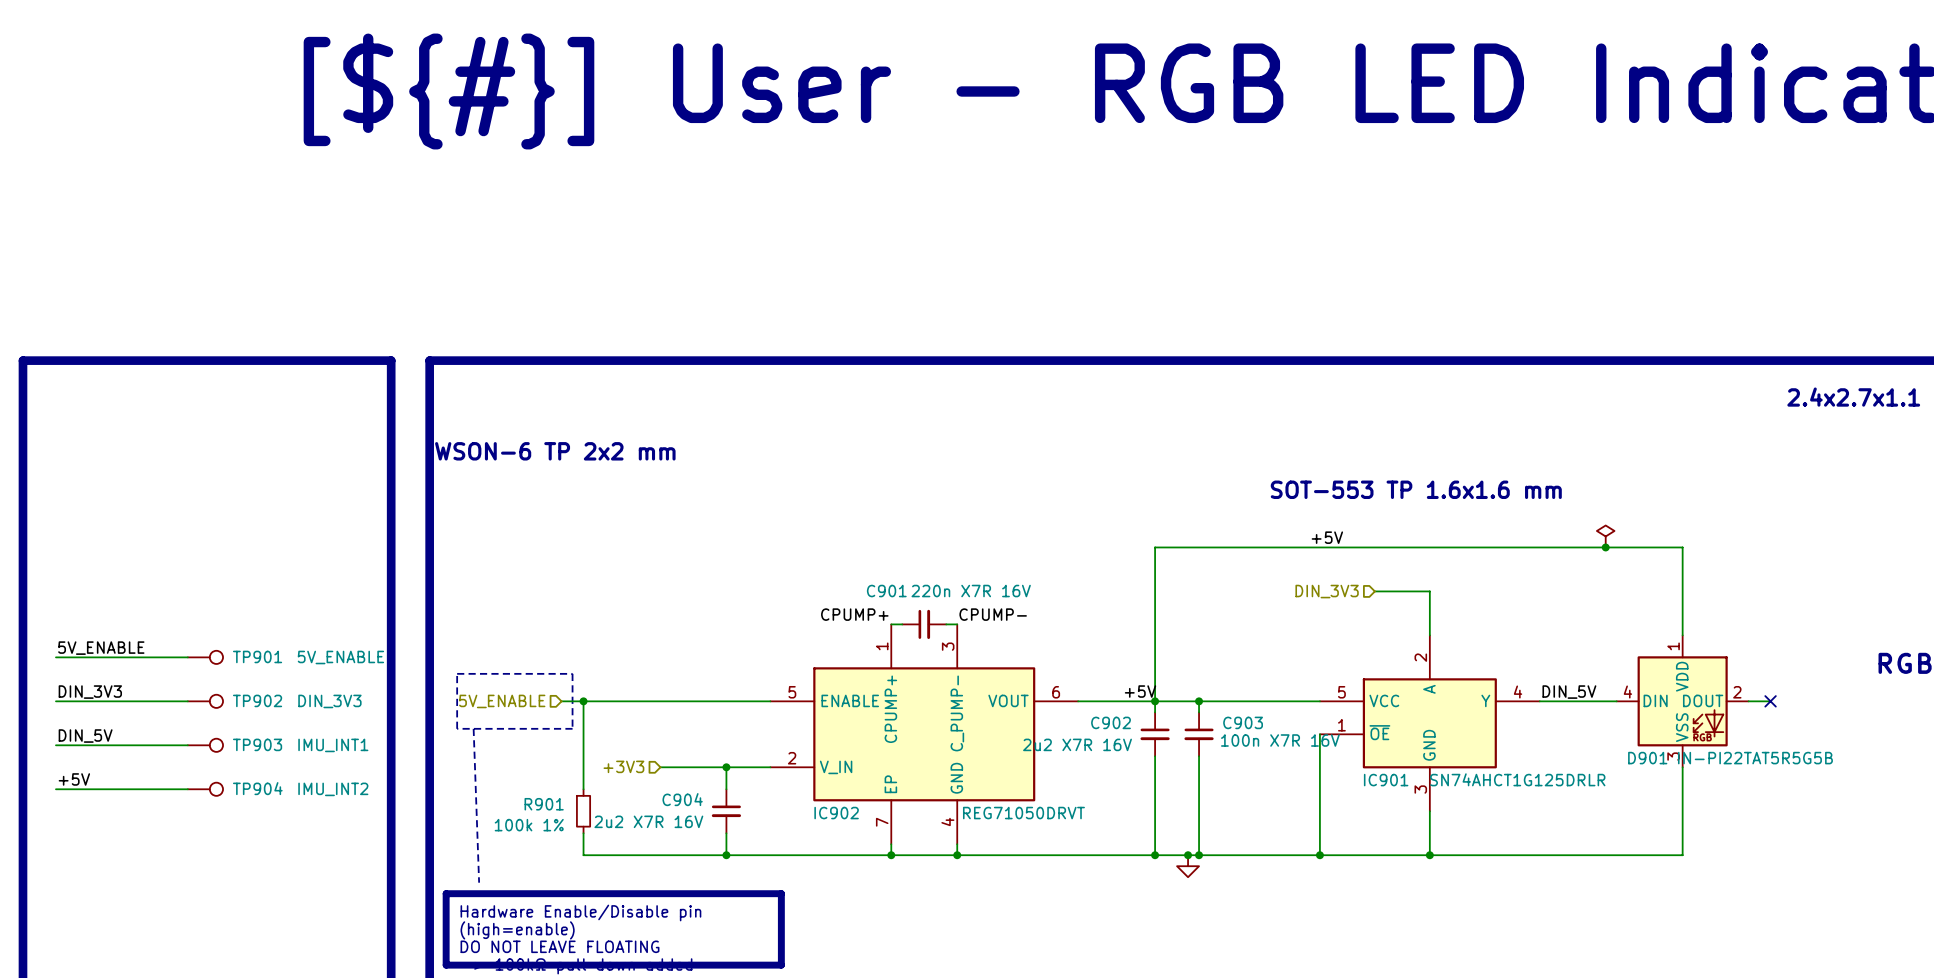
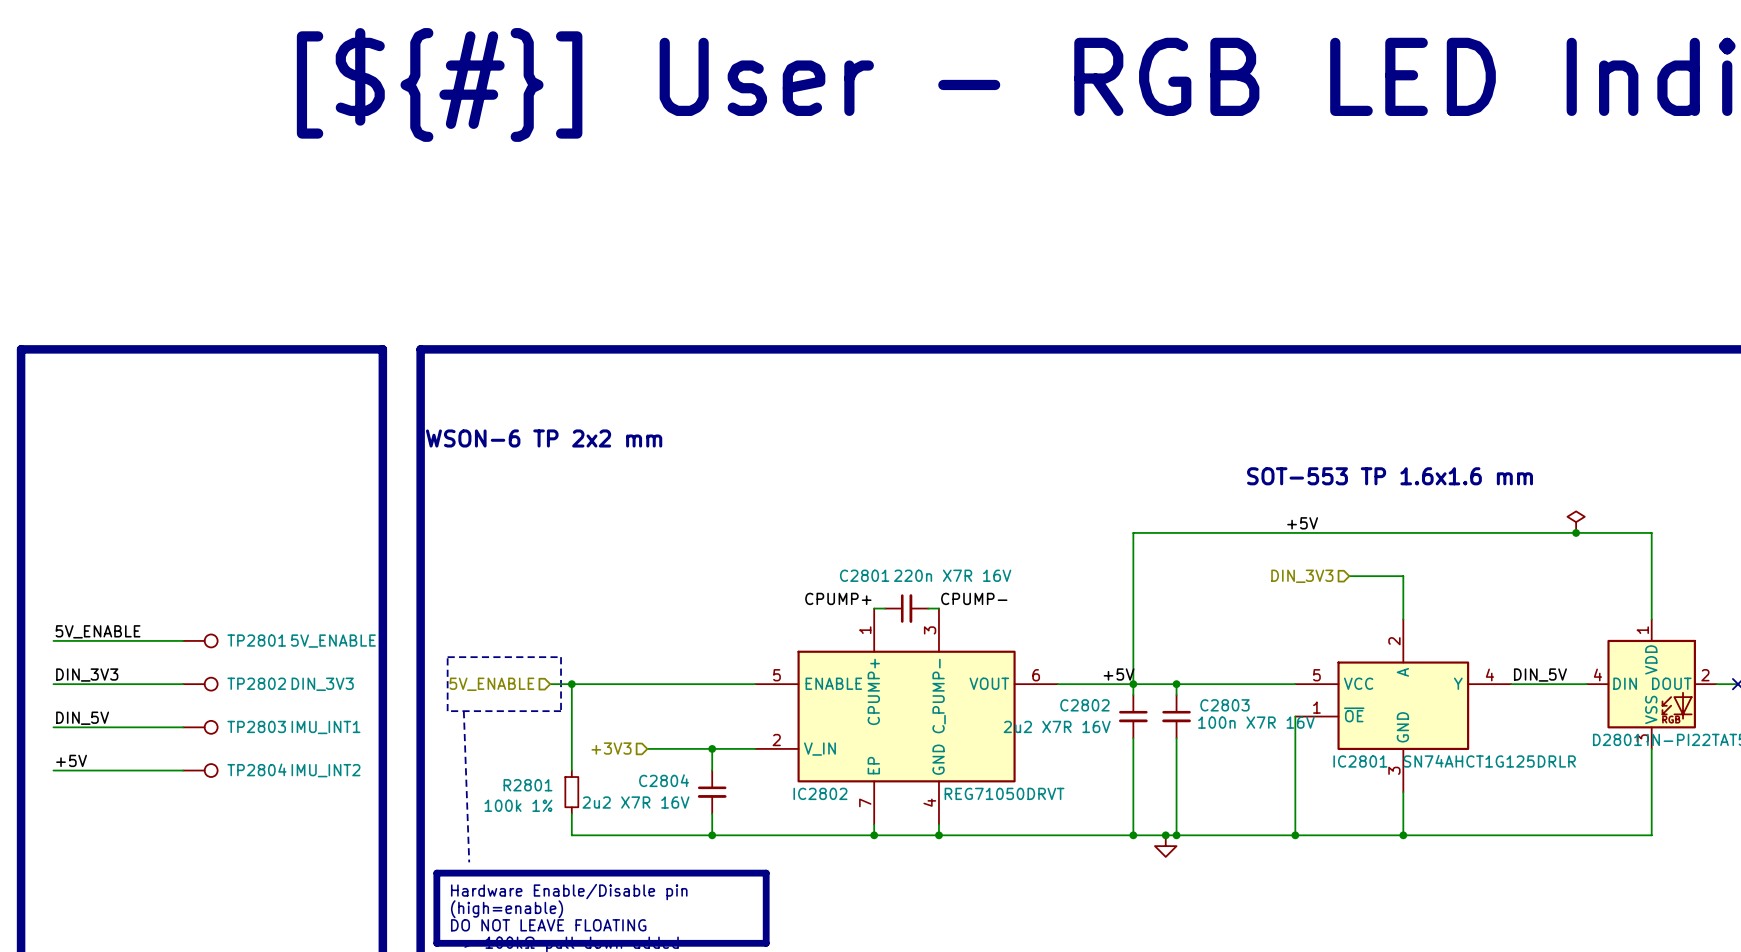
C901 name: C901 (886, 591) -> C2801 (864, 575)
TP901 name: TP901 (257, 656) -> TP2801 (256, 640)
TP902 name: TP902 (257, 700) -> TP2802 (256, 683)
C902 name: C902 (1111, 722) -> C2802 (1084, 705)
C903 name: C903 (1243, 722) -> C2803 (1224, 705)
TP903 name: TP903 (257, 744) -> TP2803 (256, 726)
D901 name: D901 (1647, 758) -> D2801 (1617, 739)
IC901 name: IC901 (1386, 780) -> IC2801 (1360, 761)
TP904 name: TP904 (257, 788) -> TP2804 (256, 769)
C904 name: C904 (682, 799) -> C2804 (664, 780)
R901 name: R901 (544, 804) -> R2801 (527, 785)
IC902 name: IC902 (836, 813) -> IC2802 (820, 793)

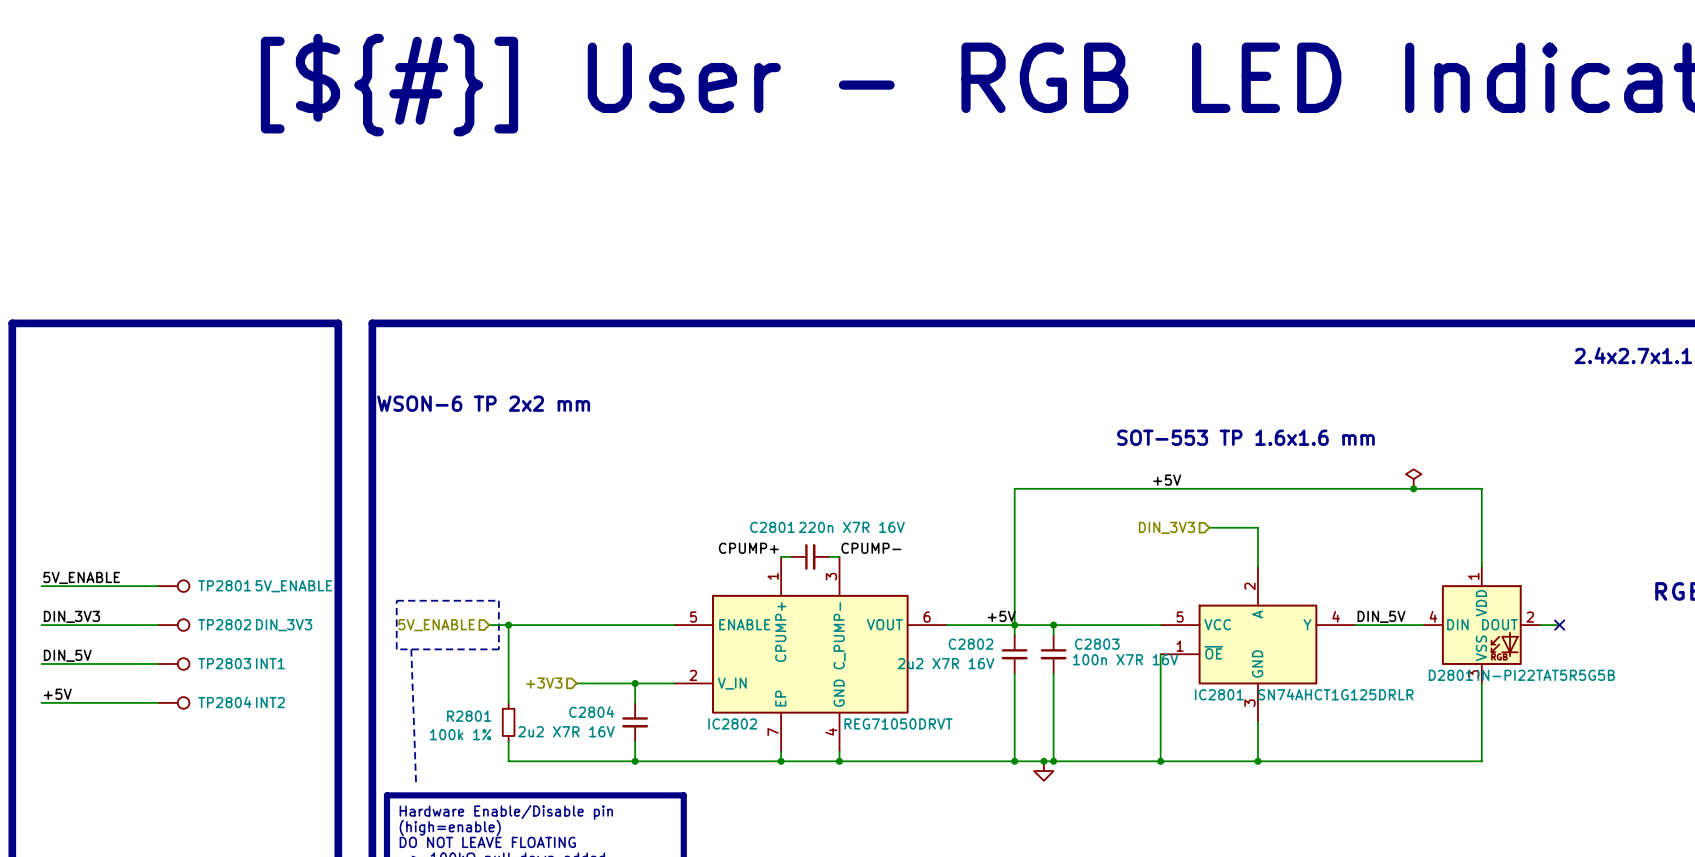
TP2803 value: IMU_INT1 (326, 727) -> INT1 (270, 663)
TP2804 value: IMU_INT2 (326, 770) -> INT2 (270, 702)

